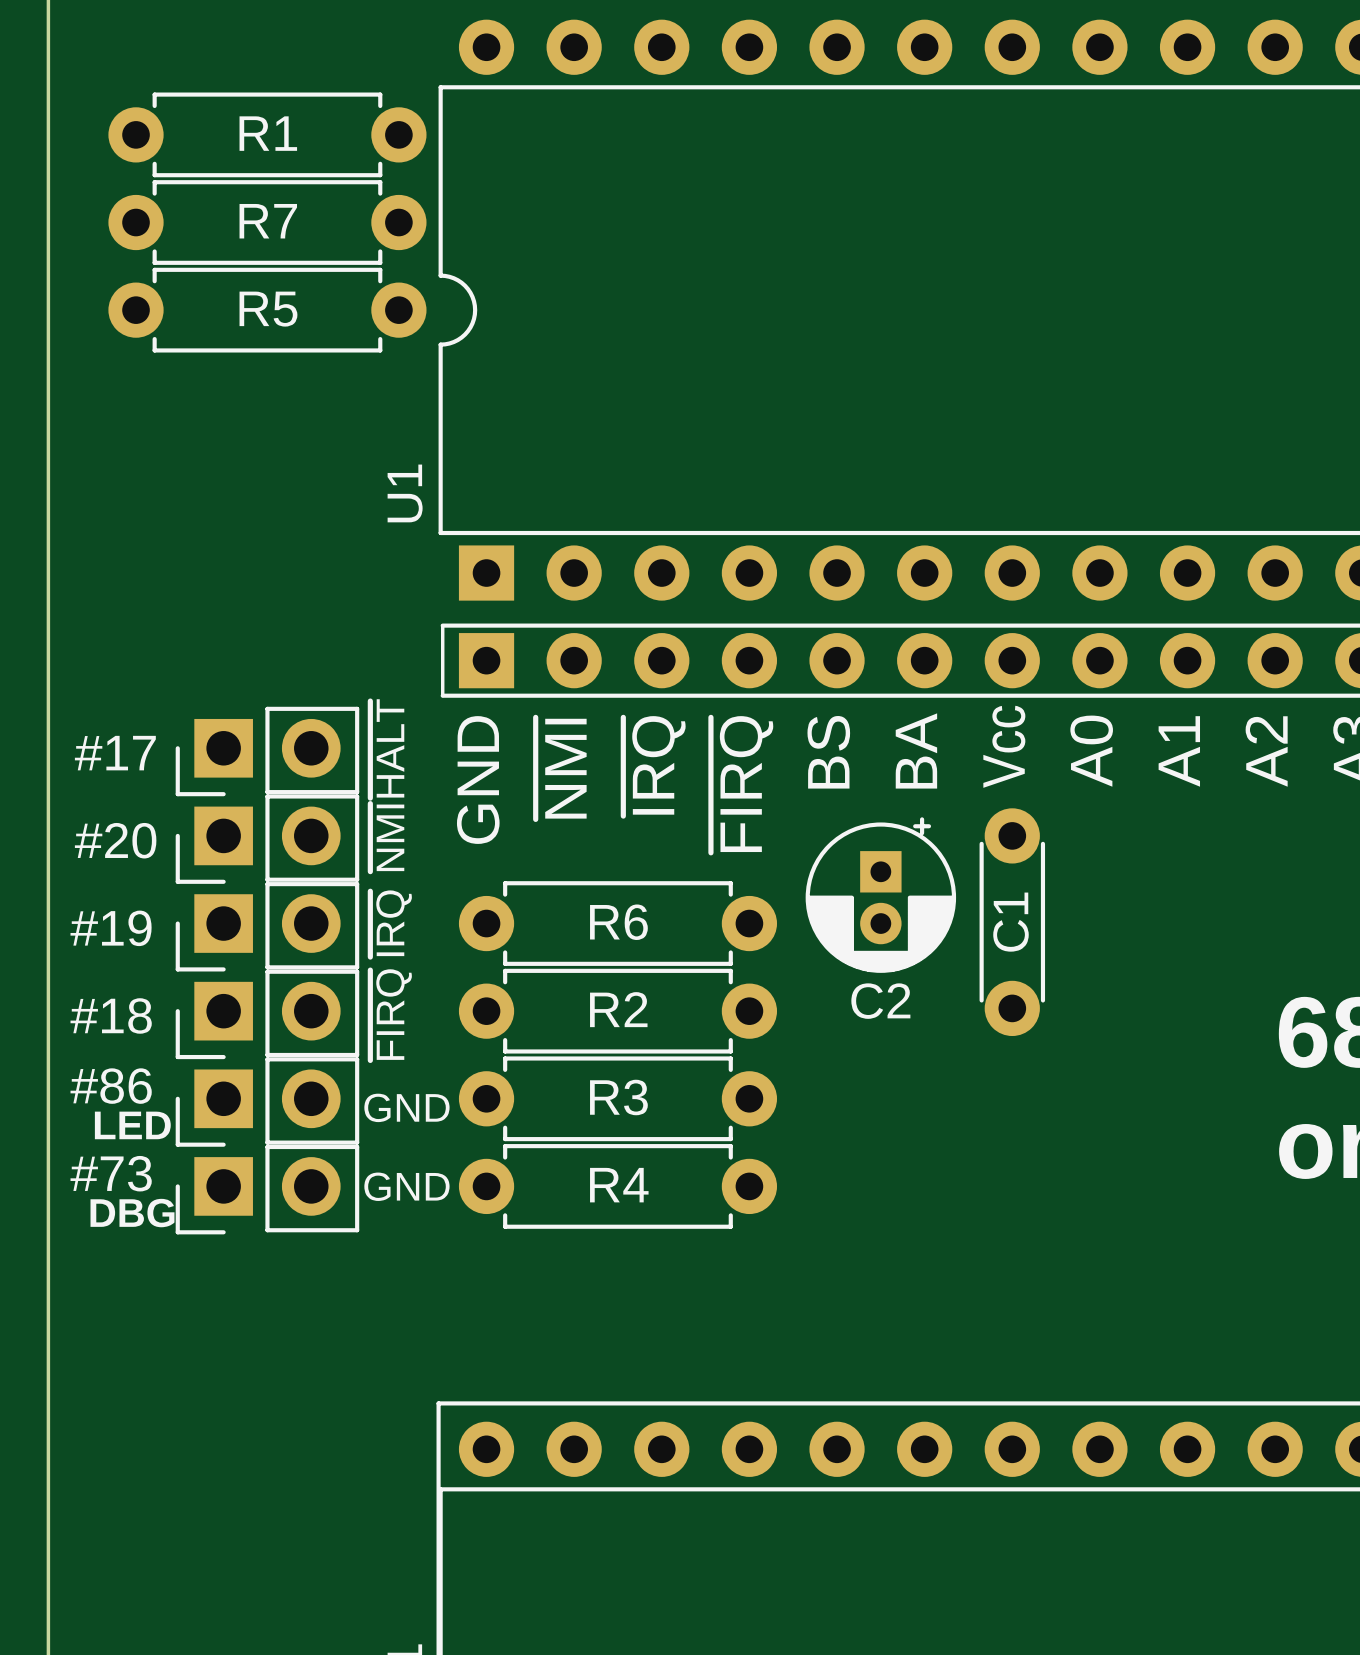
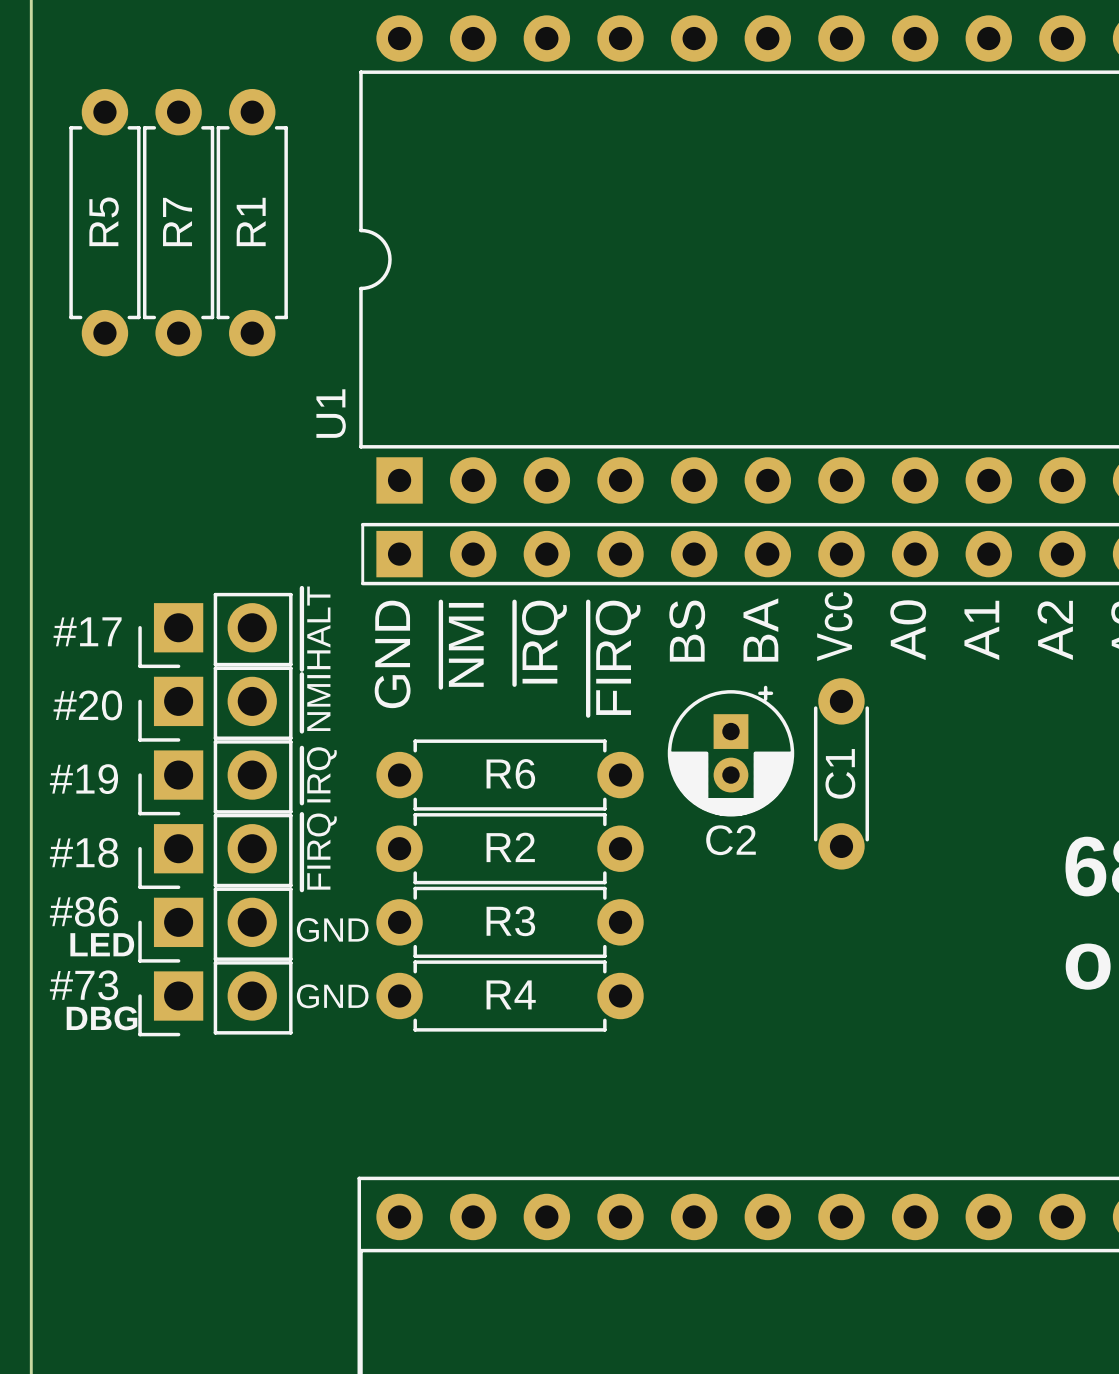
R1 rotation: 0° (267, 134) -> 90° clockwise (252, 222)
R7 rotation: 0° (267, 222) -> 90° clockwise (178, 222)
R5 rotation: 0° (267, 310) -> 90° clockwise (104, 222)

